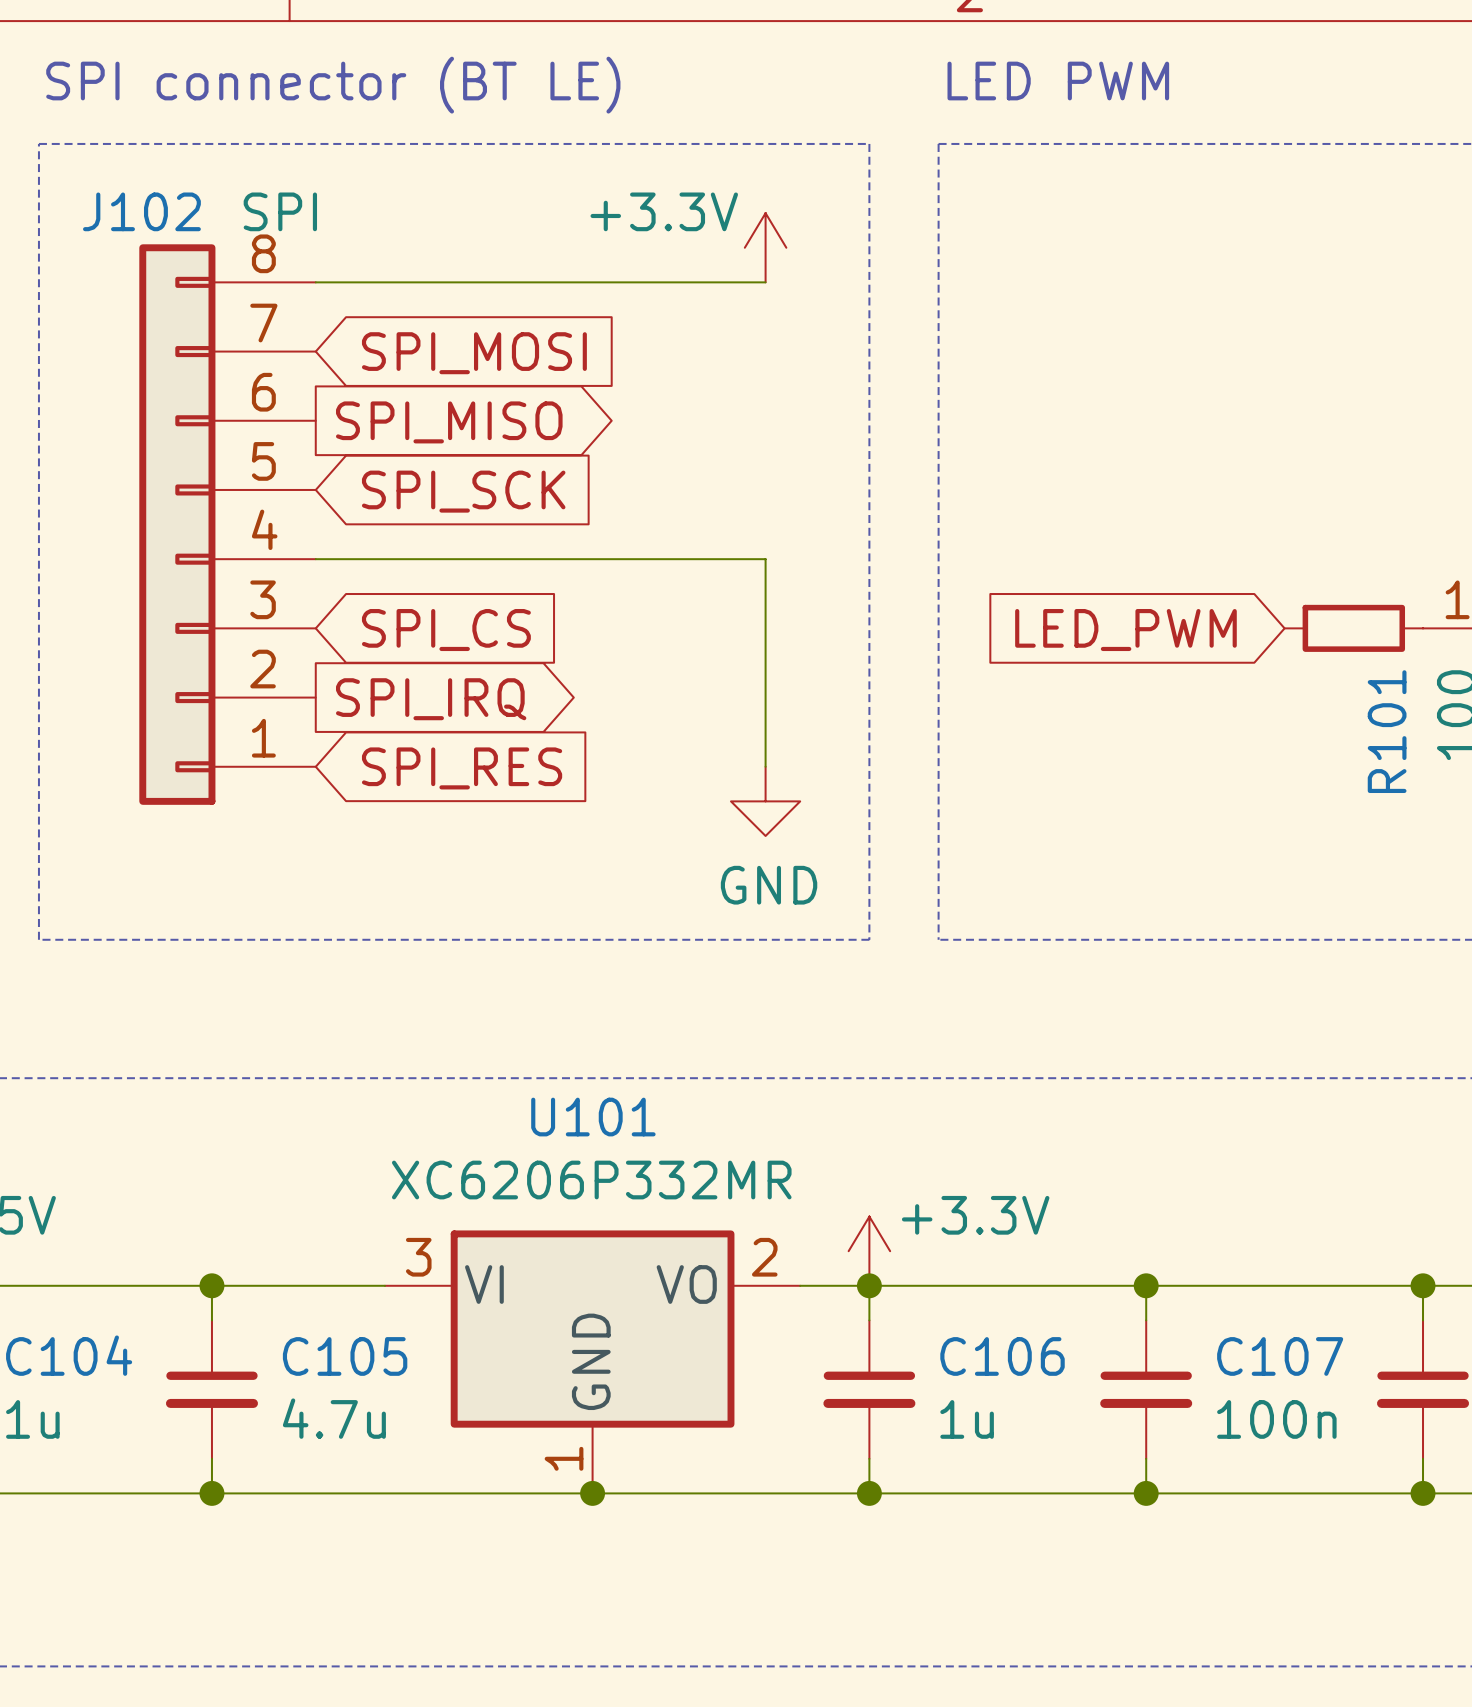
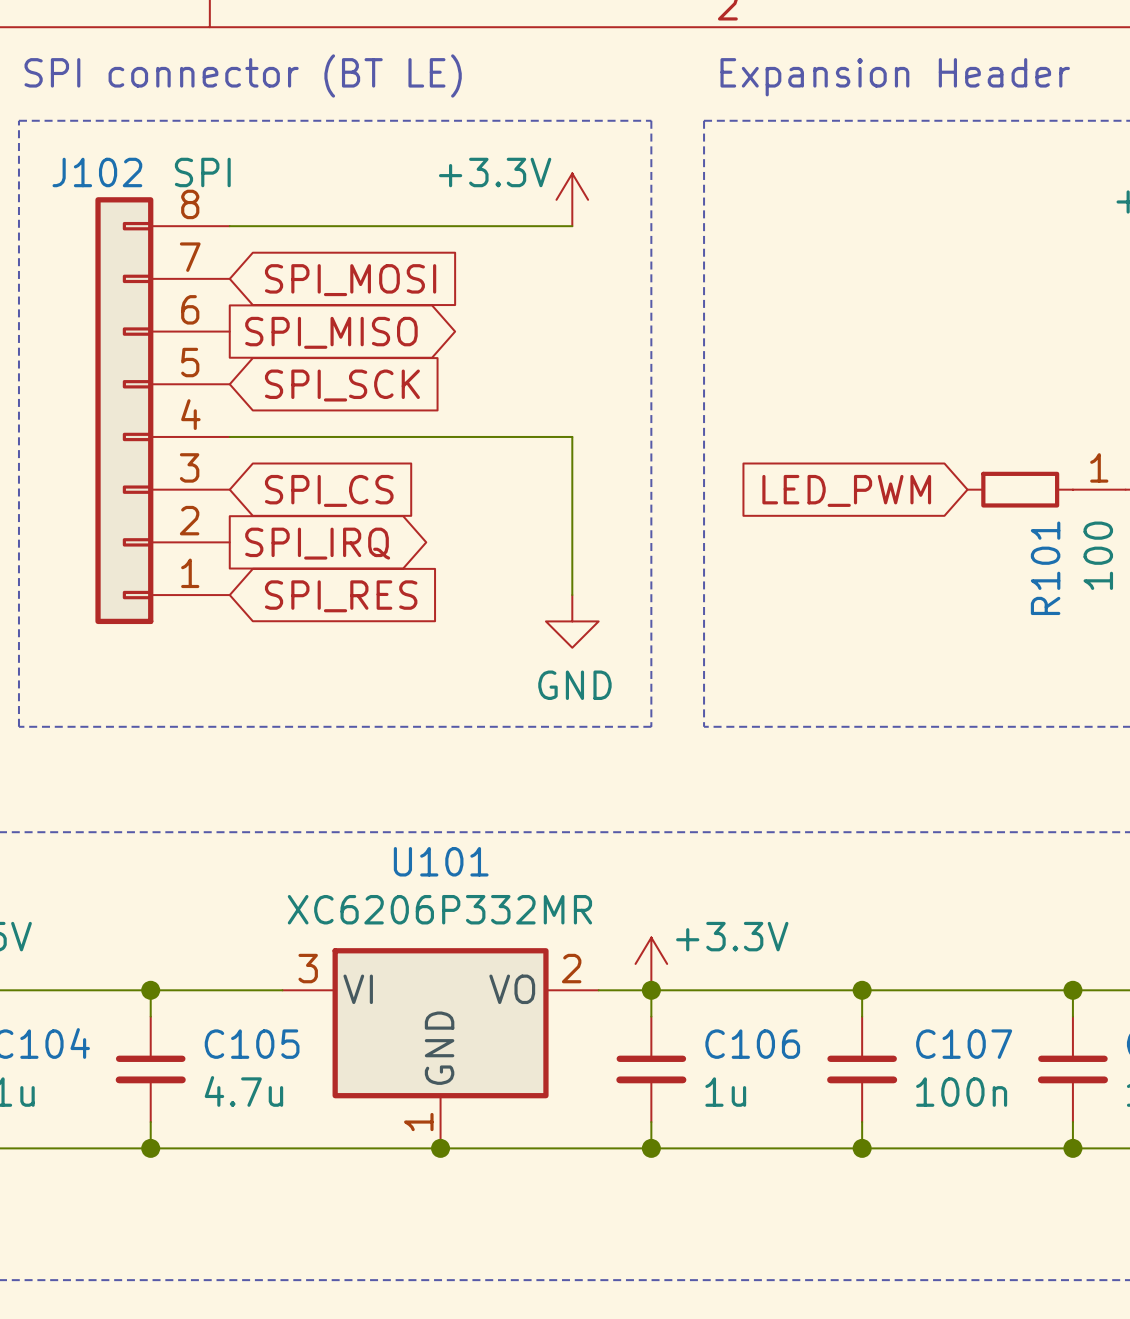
text: LED PWM (1058, 81) -> none
text: none -> Expansion Header (895, 77)

